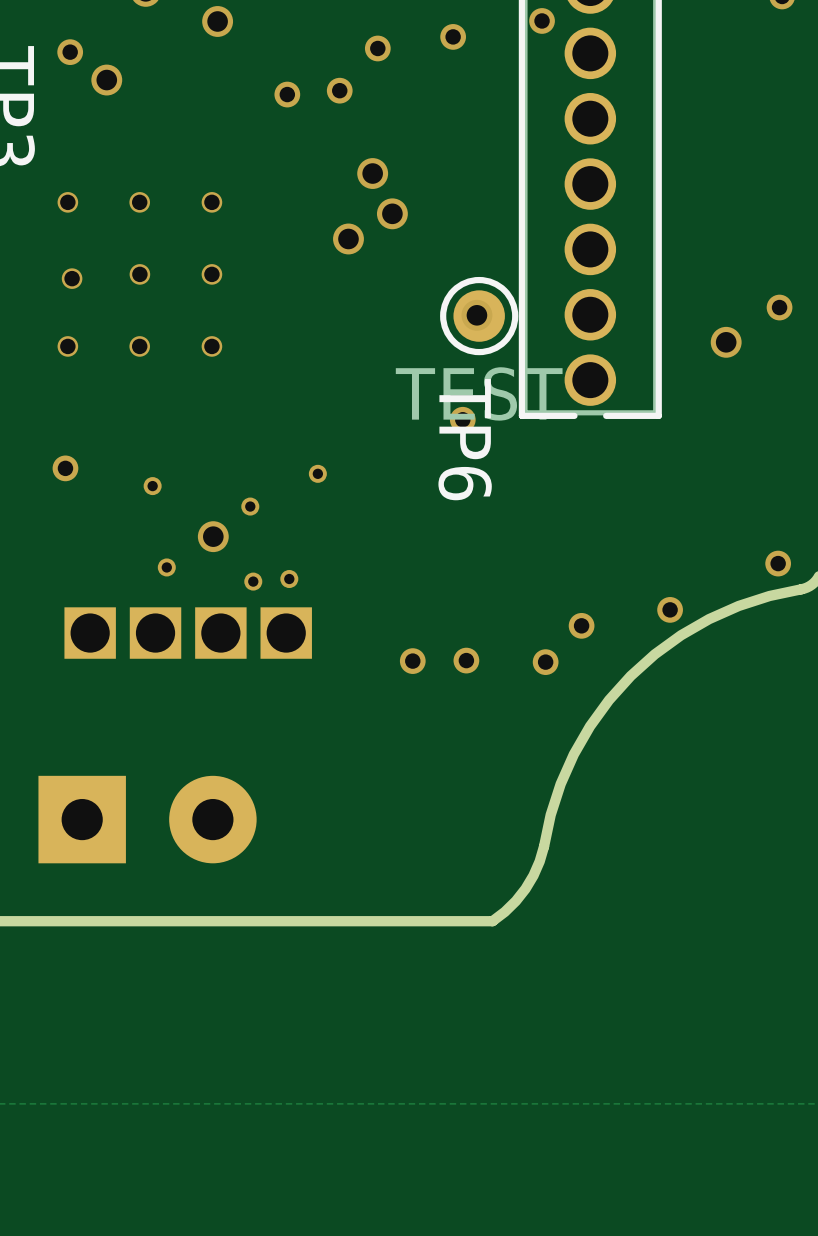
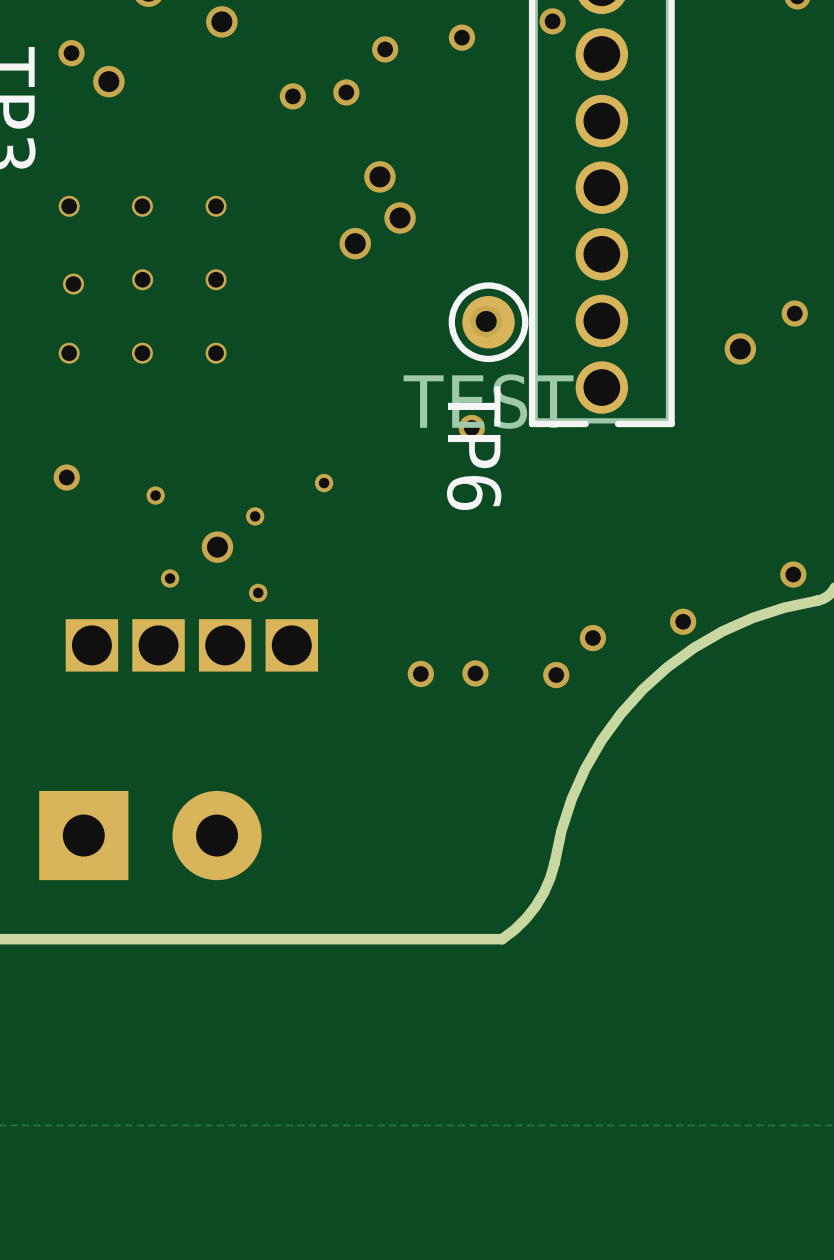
via: (289, 579) -> none

